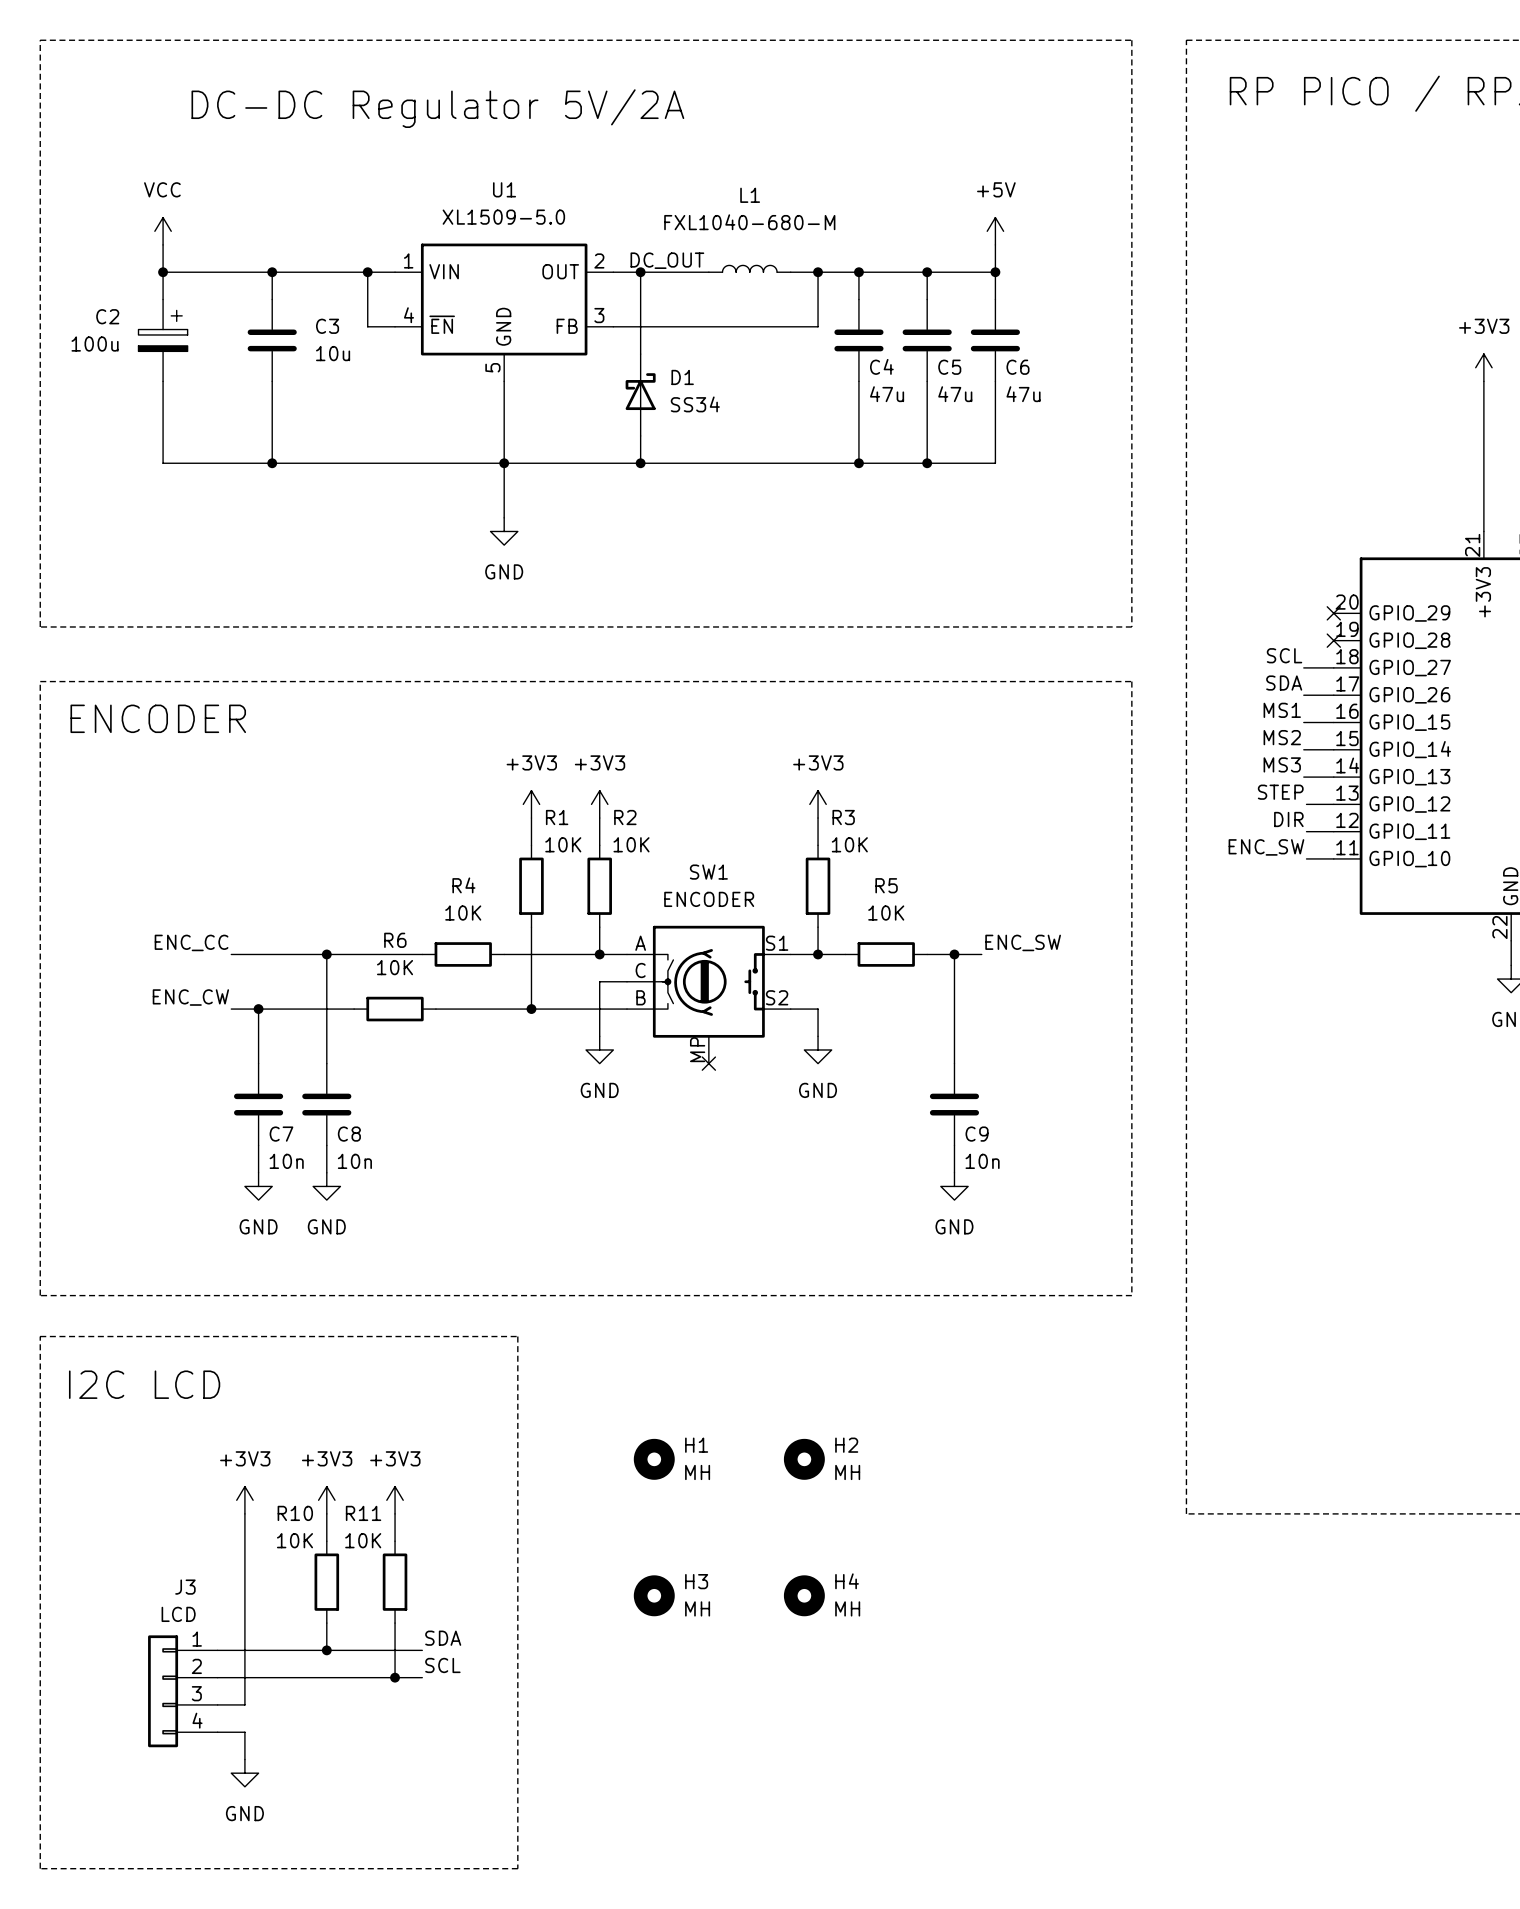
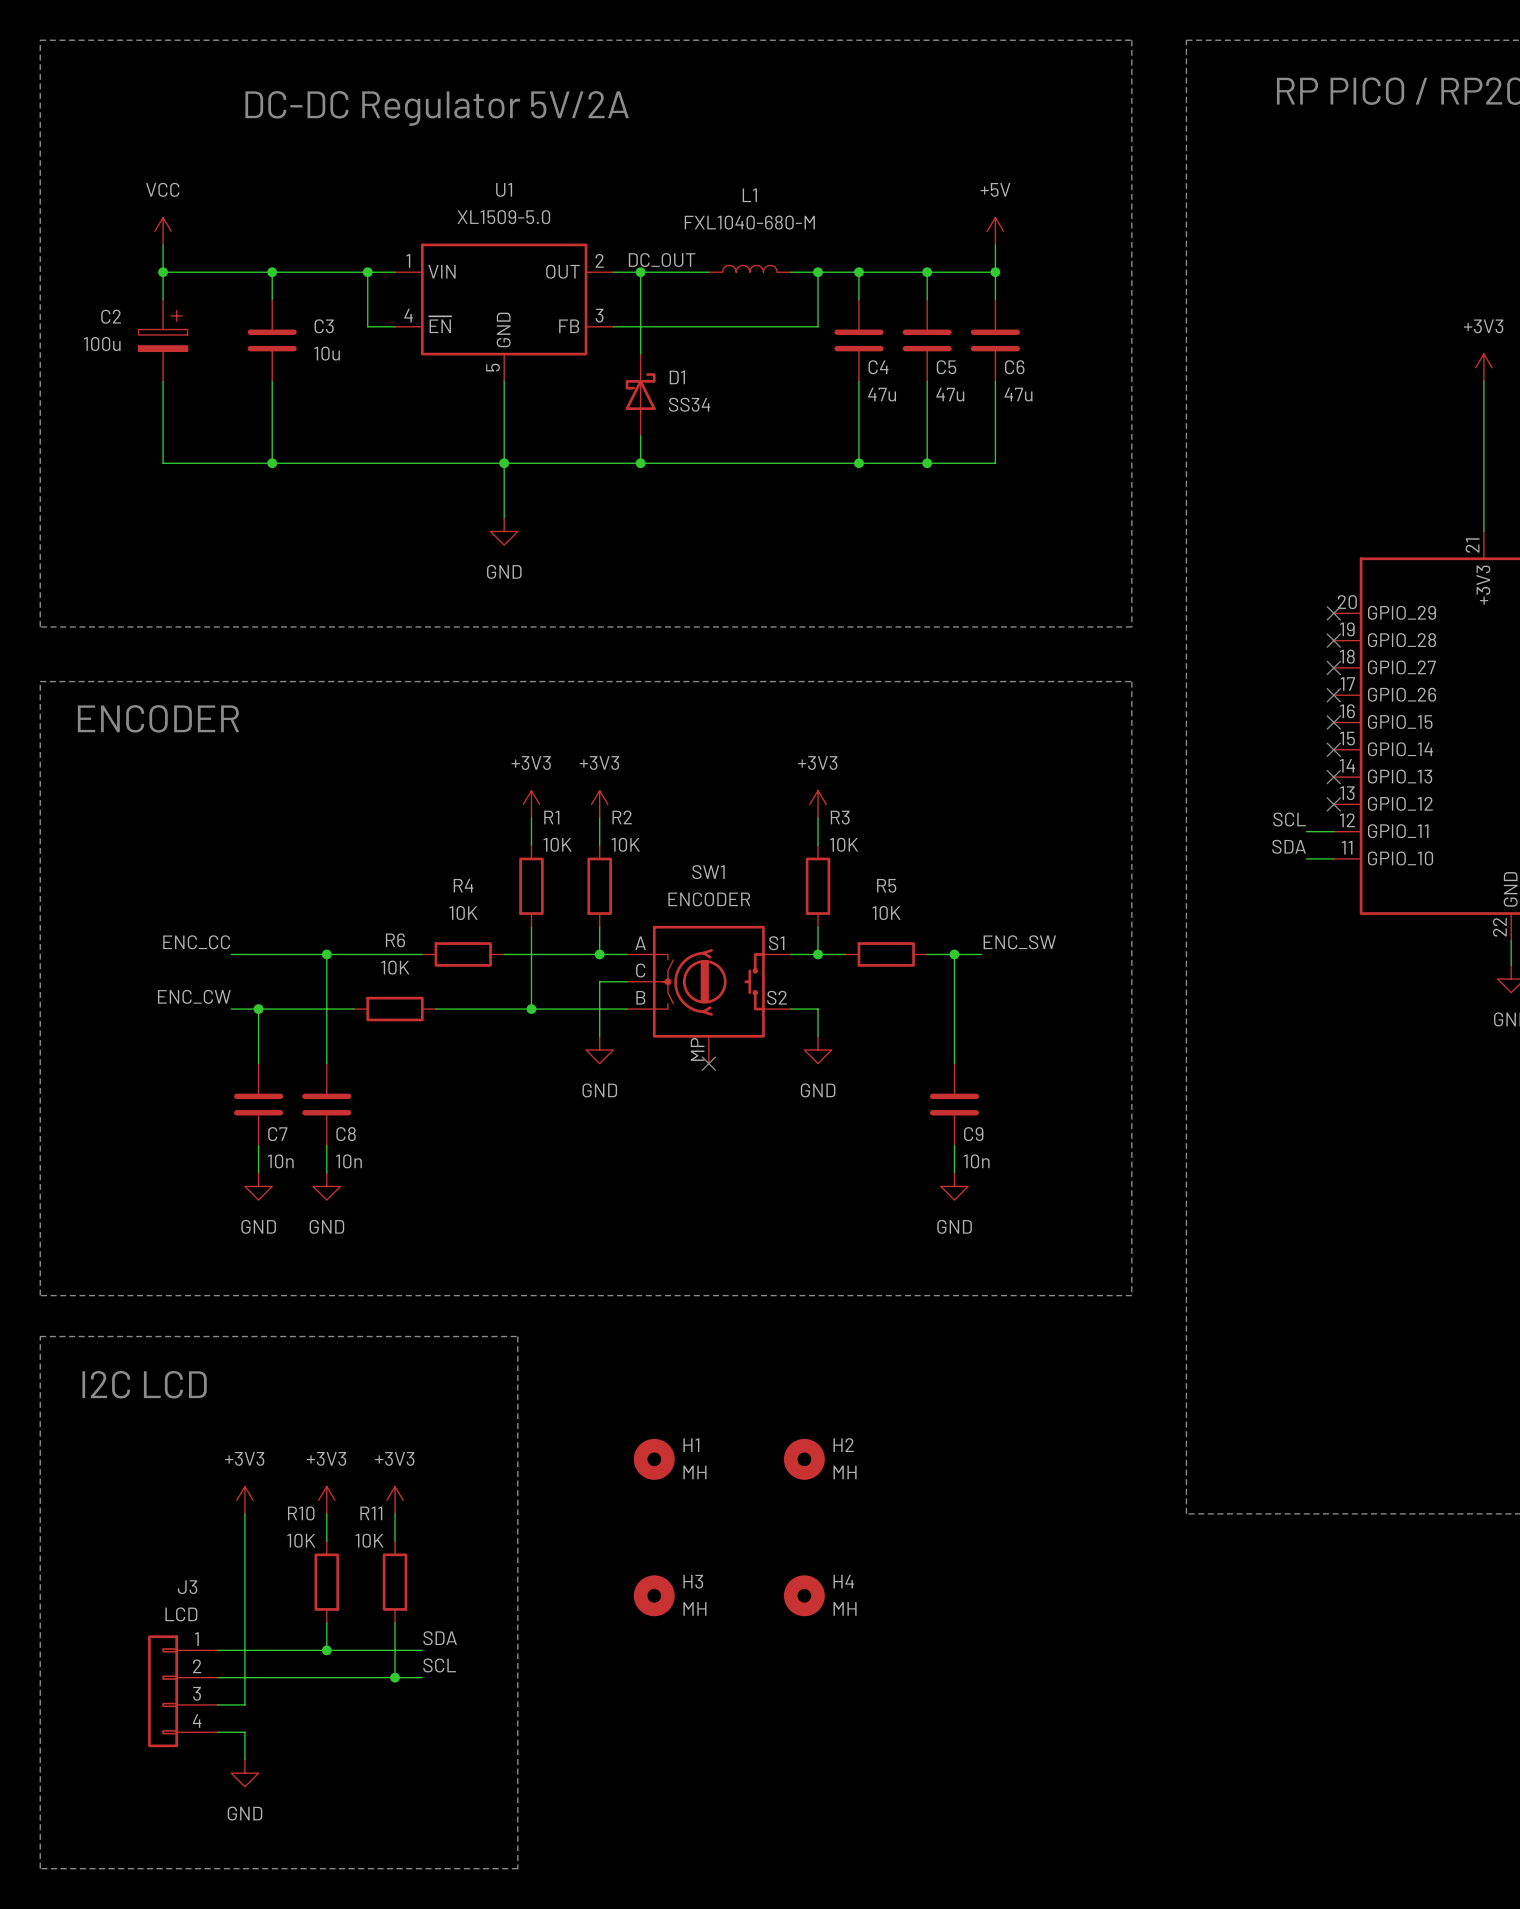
label: SCL (1284, 655) -> none
wire: (1303, 667) (1333, 667) -> none
no-connect mark: none -> (1333, 667)
label: SDA (1284, 683) -> none
wire: (1303, 695) (1333, 695) -> none
no-connect mark: none -> (1333, 695)
label: MS1 (1282, 710) -> none
wire: (1303, 722) (1333, 722) -> none
no-connect mark: none -> (1333, 722)
label: MS2 (1282, 737) -> none
wire: (1303, 749) (1333, 749) -> none
no-connect mark: none -> (1333, 749)
label: MS3 (1282, 764) -> none
wire: (1303, 777) (1333, 777) -> none
no-connect mark: none -> (1333, 777)
label: STEP (1280, 792) -> none
wire: (1306, 804) (1333, 804) -> none
no-connect mark: none -> (1333, 804)
label: DIR (1288, 819) -> SCL (1289, 819)
label: ENC_SW (1266, 847) -> SDA (1289, 846)

